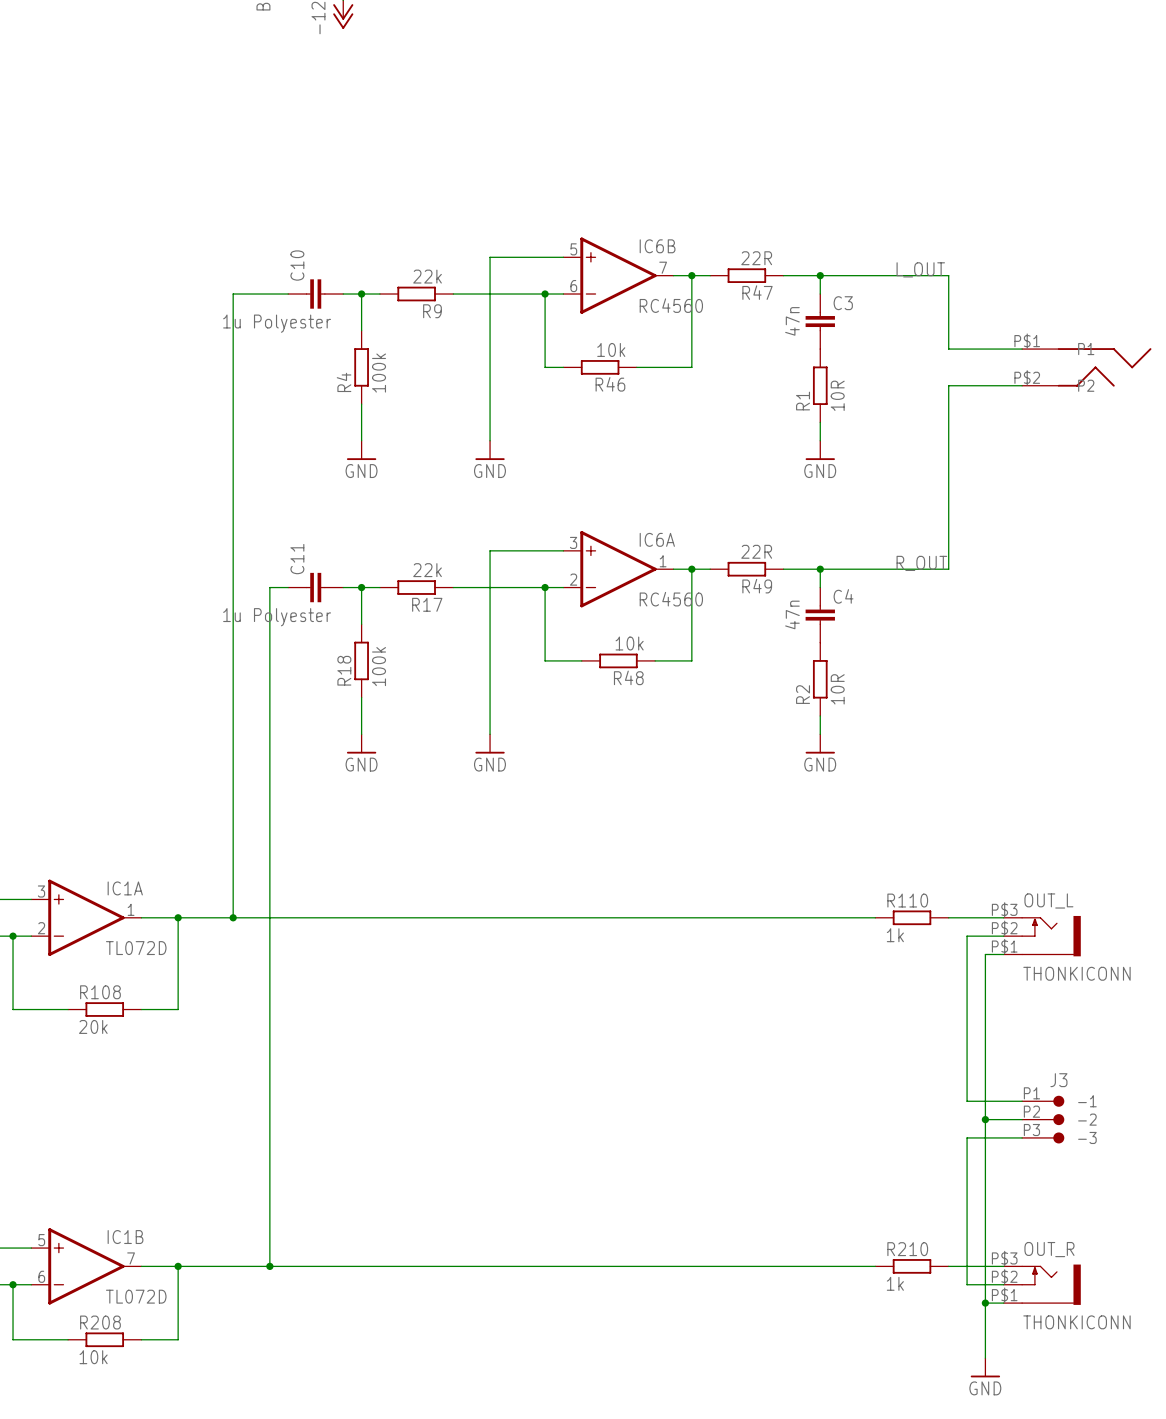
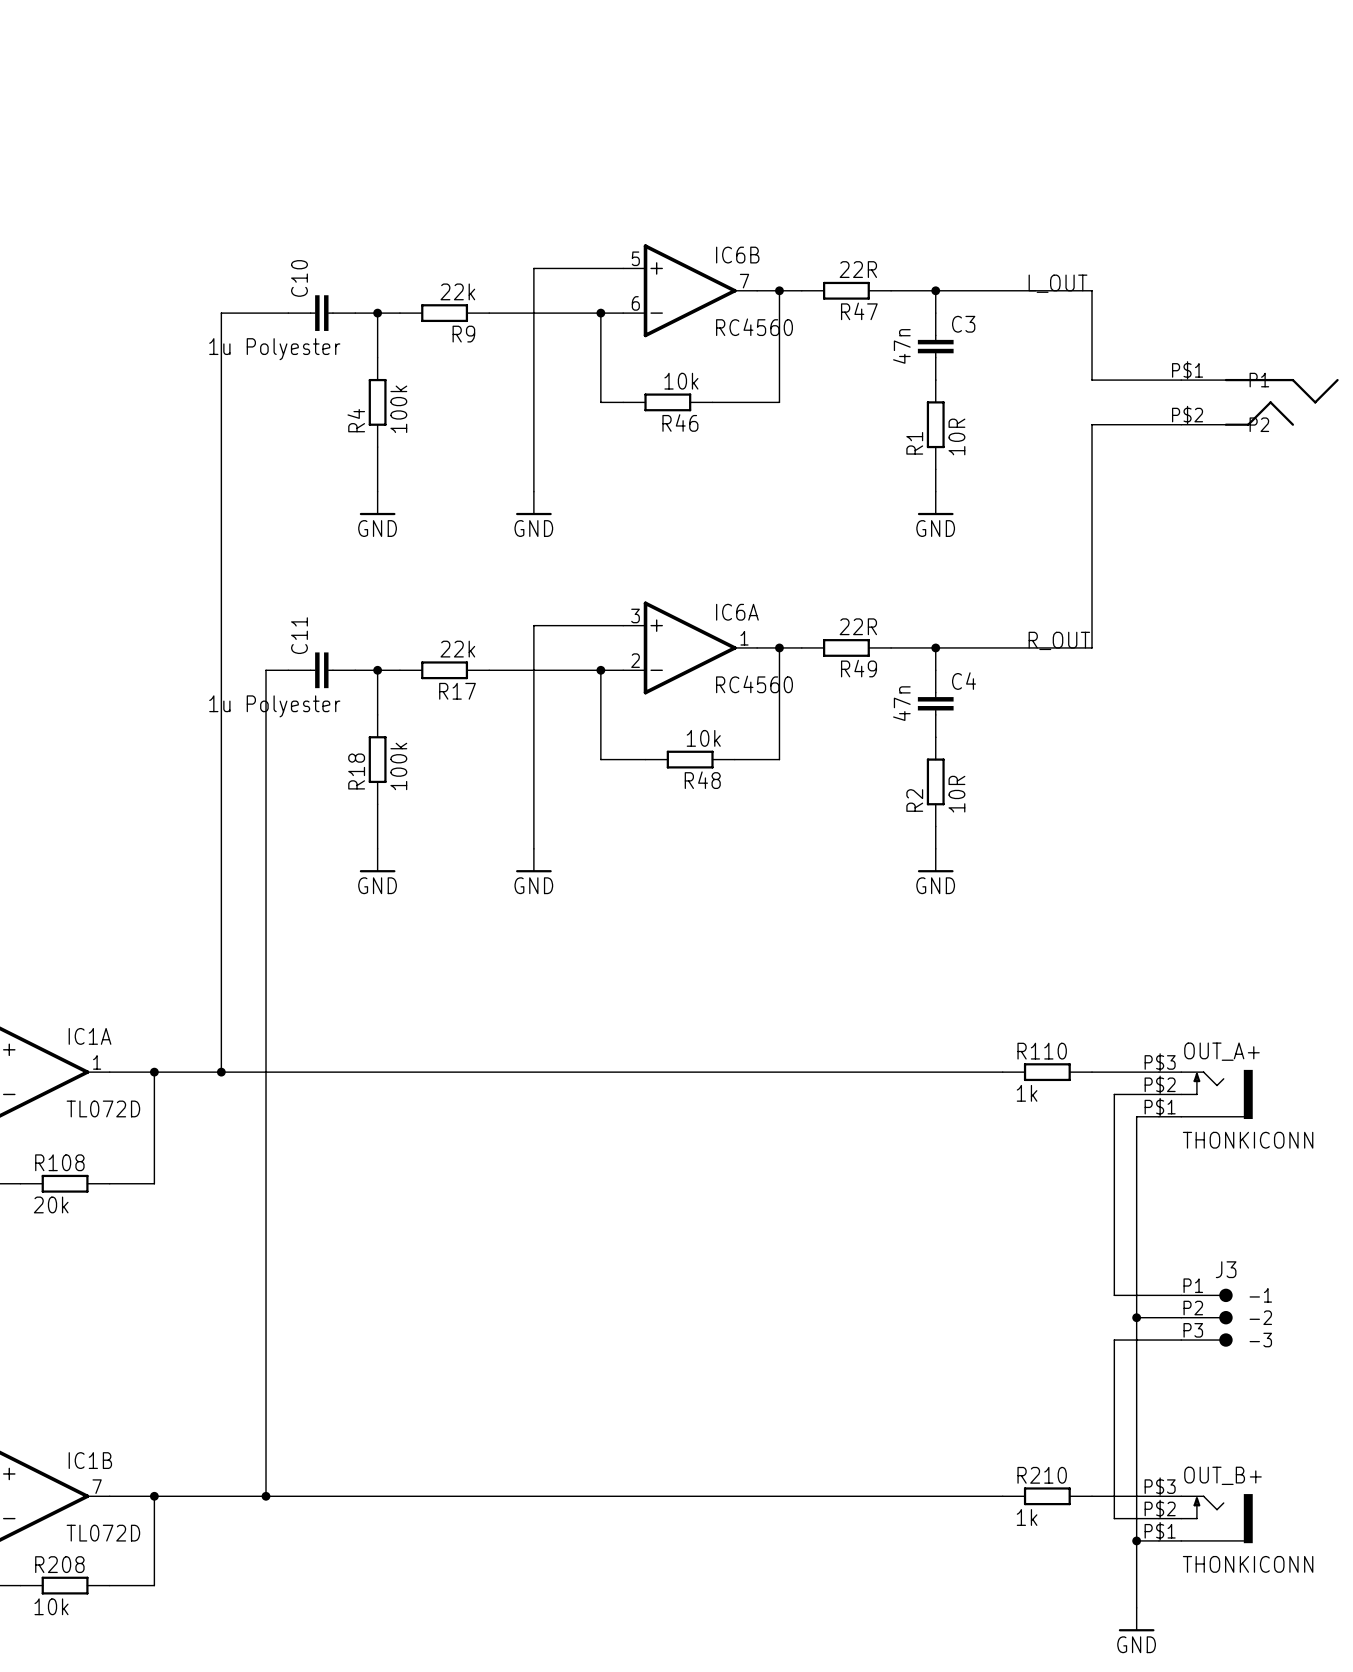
OUT_L name: OUT_L (1048, 900) -> OUT_A+ (1221, 1051)
OUT_R name: OUT_R (1049, 1249) -> OUT_B+ (1222, 1475)

